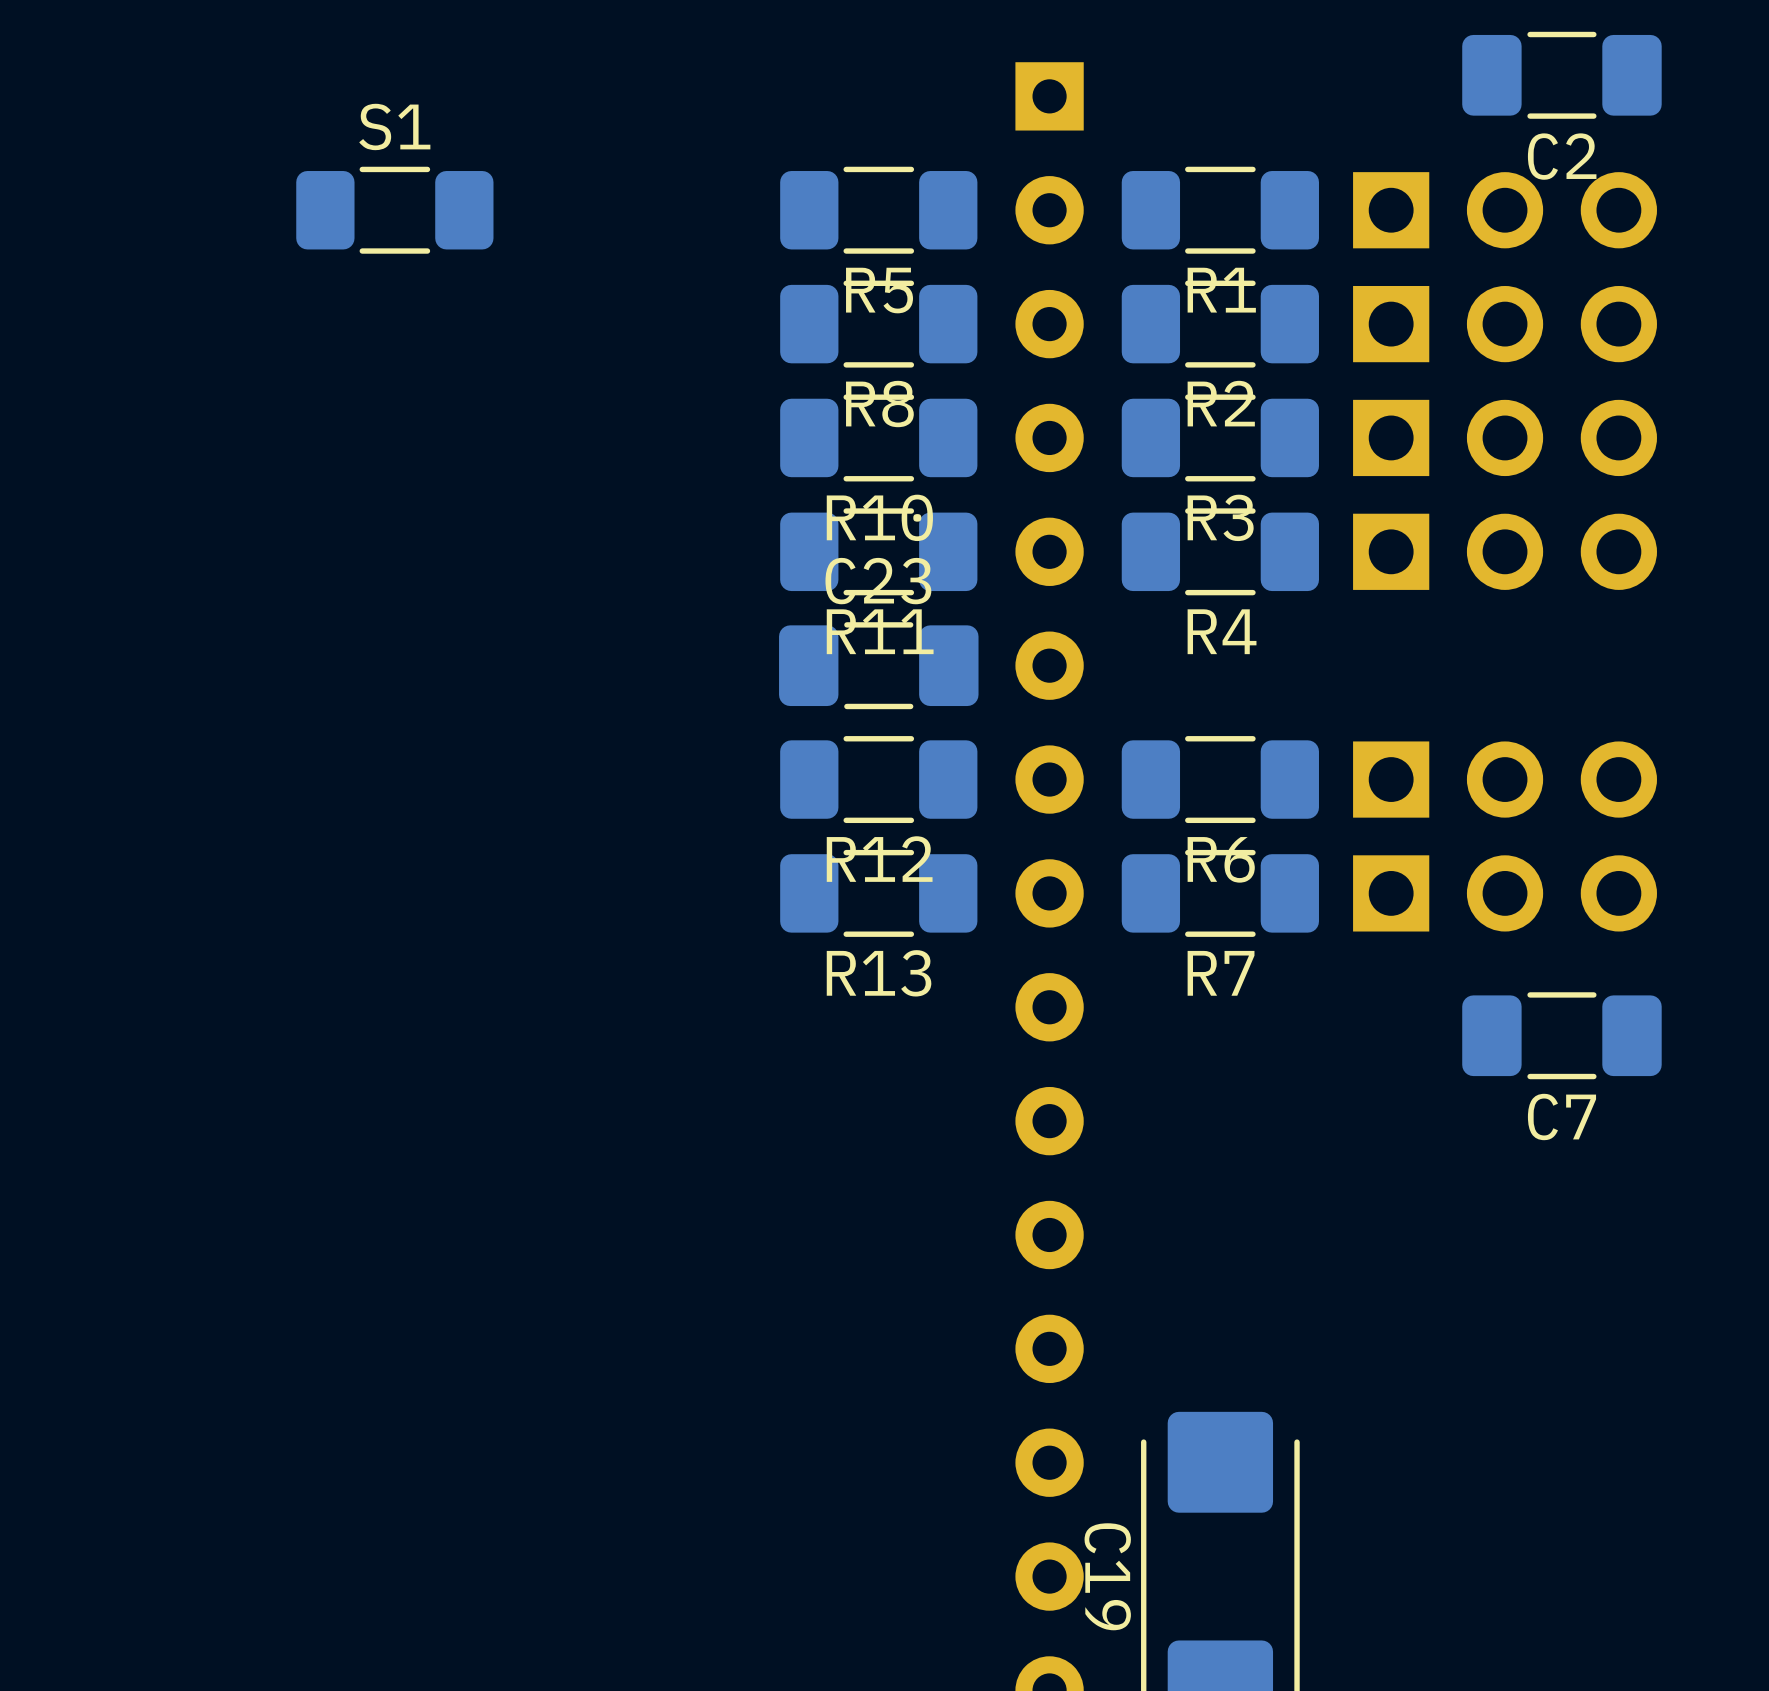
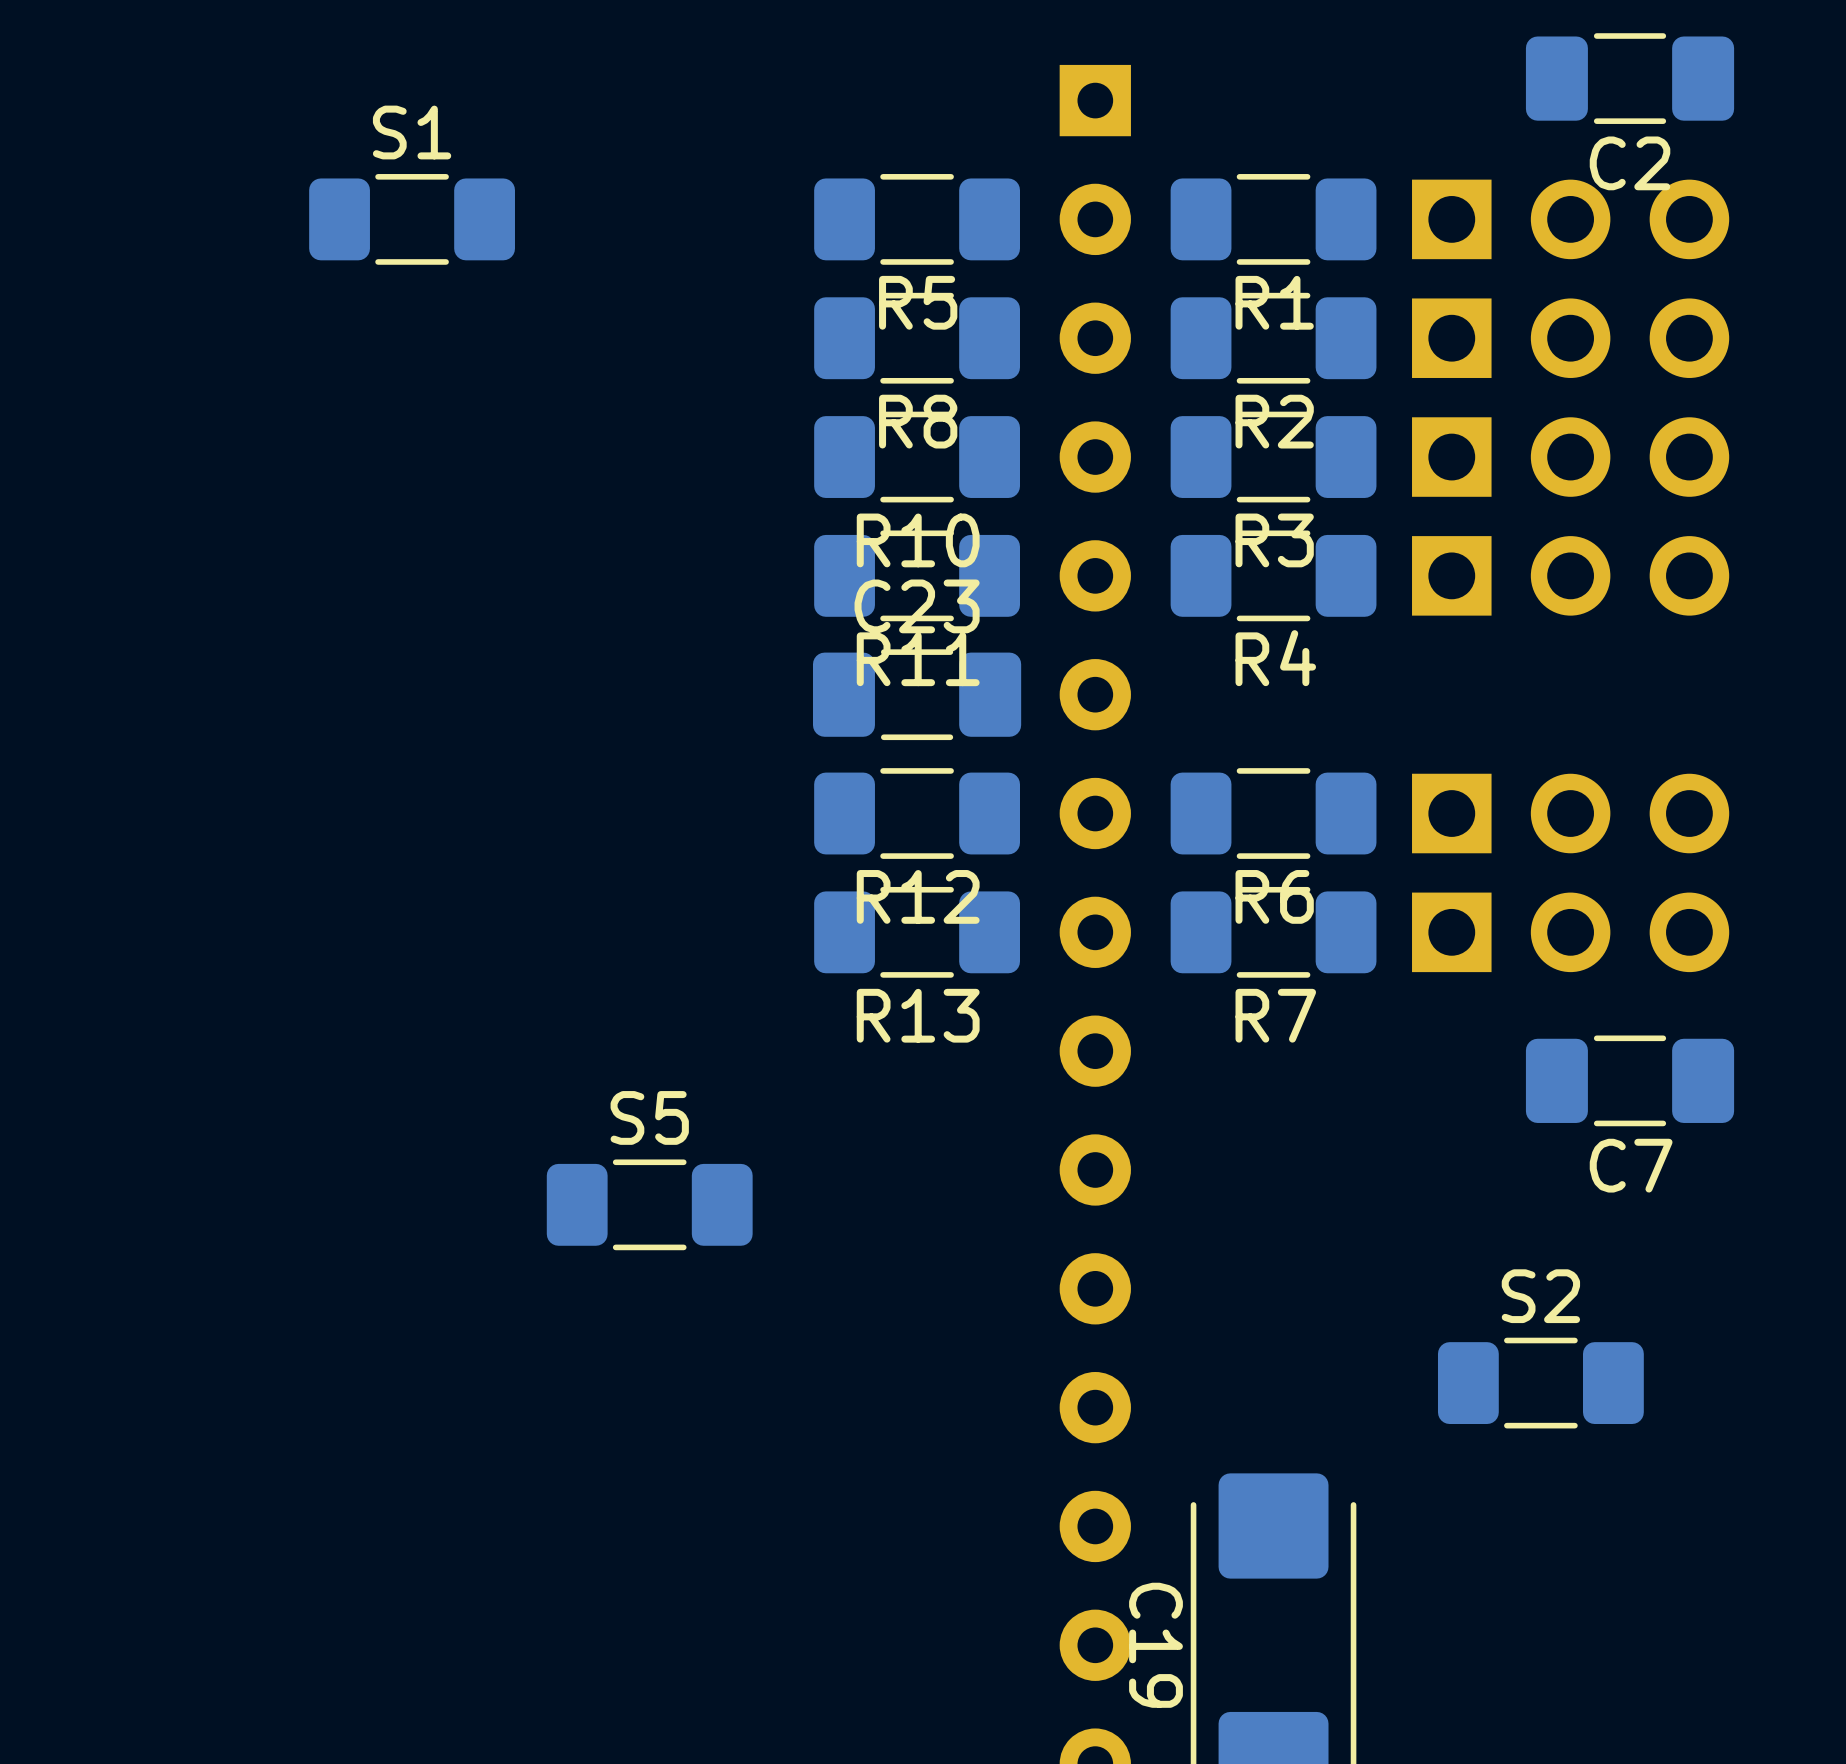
S5: none -> (649, 1204)
S2: none -> (1540, 1383)

